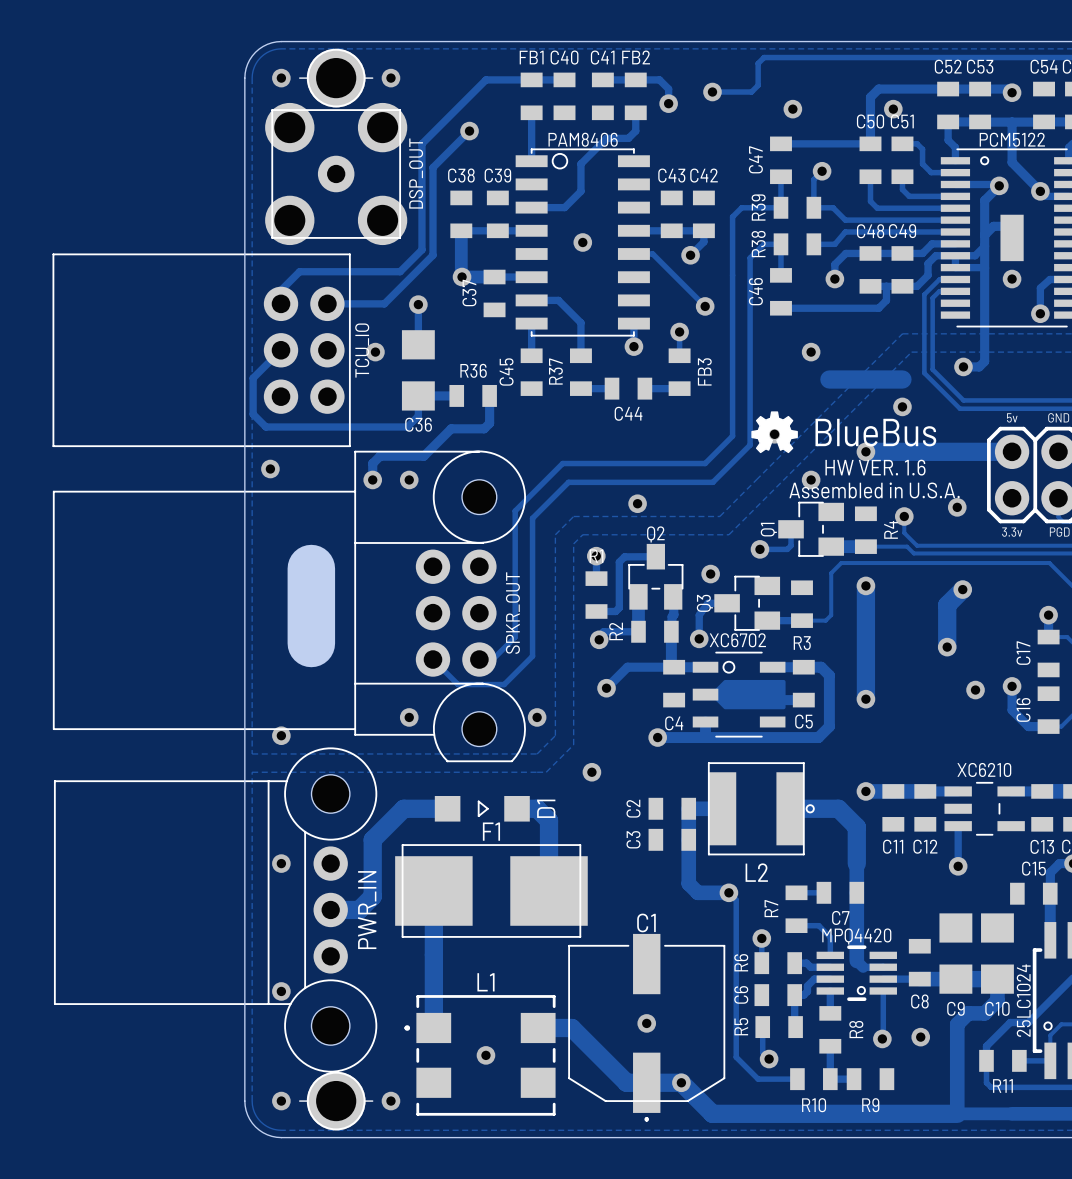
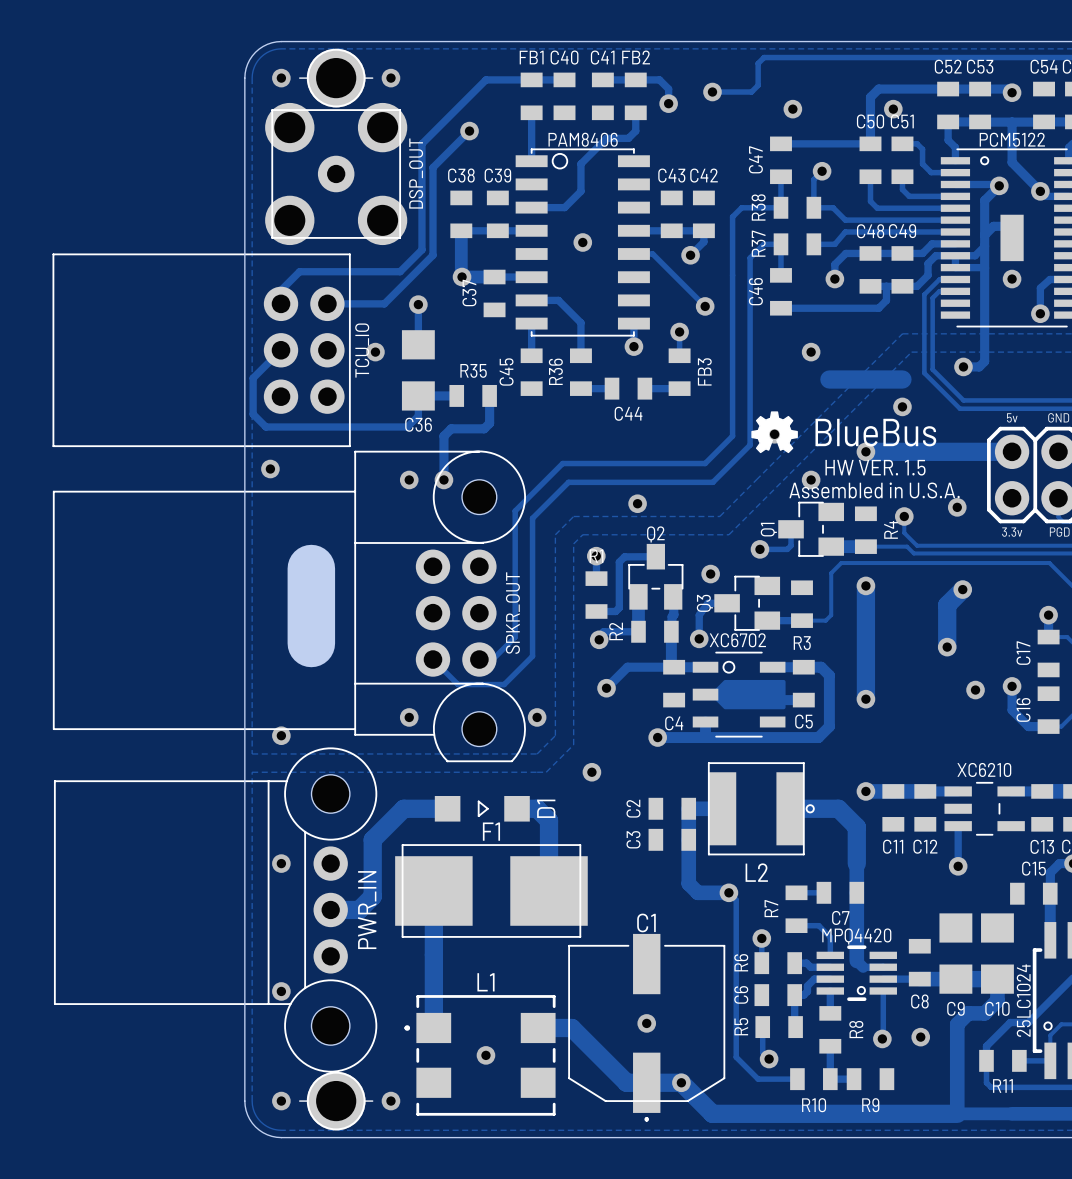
R39 name: R39 (758, 207) -> R38 (758, 207)
R38 name: R38 (758, 244) -> R37 (758, 243)
R36 name: R36 (473, 370) -> R35 (473, 370)
R37 name: R37 (555, 371) -> R36 (555, 371)
track: (443, 436) (423, 456) (380, 456) (372, 463) (372, 479) -> (443, 436) (443, 479)
text: HW VER. 1.6 (875, 467) -> HW VER. 1.5 (875, 467)
via position: (372, 479) -> (443, 479)

